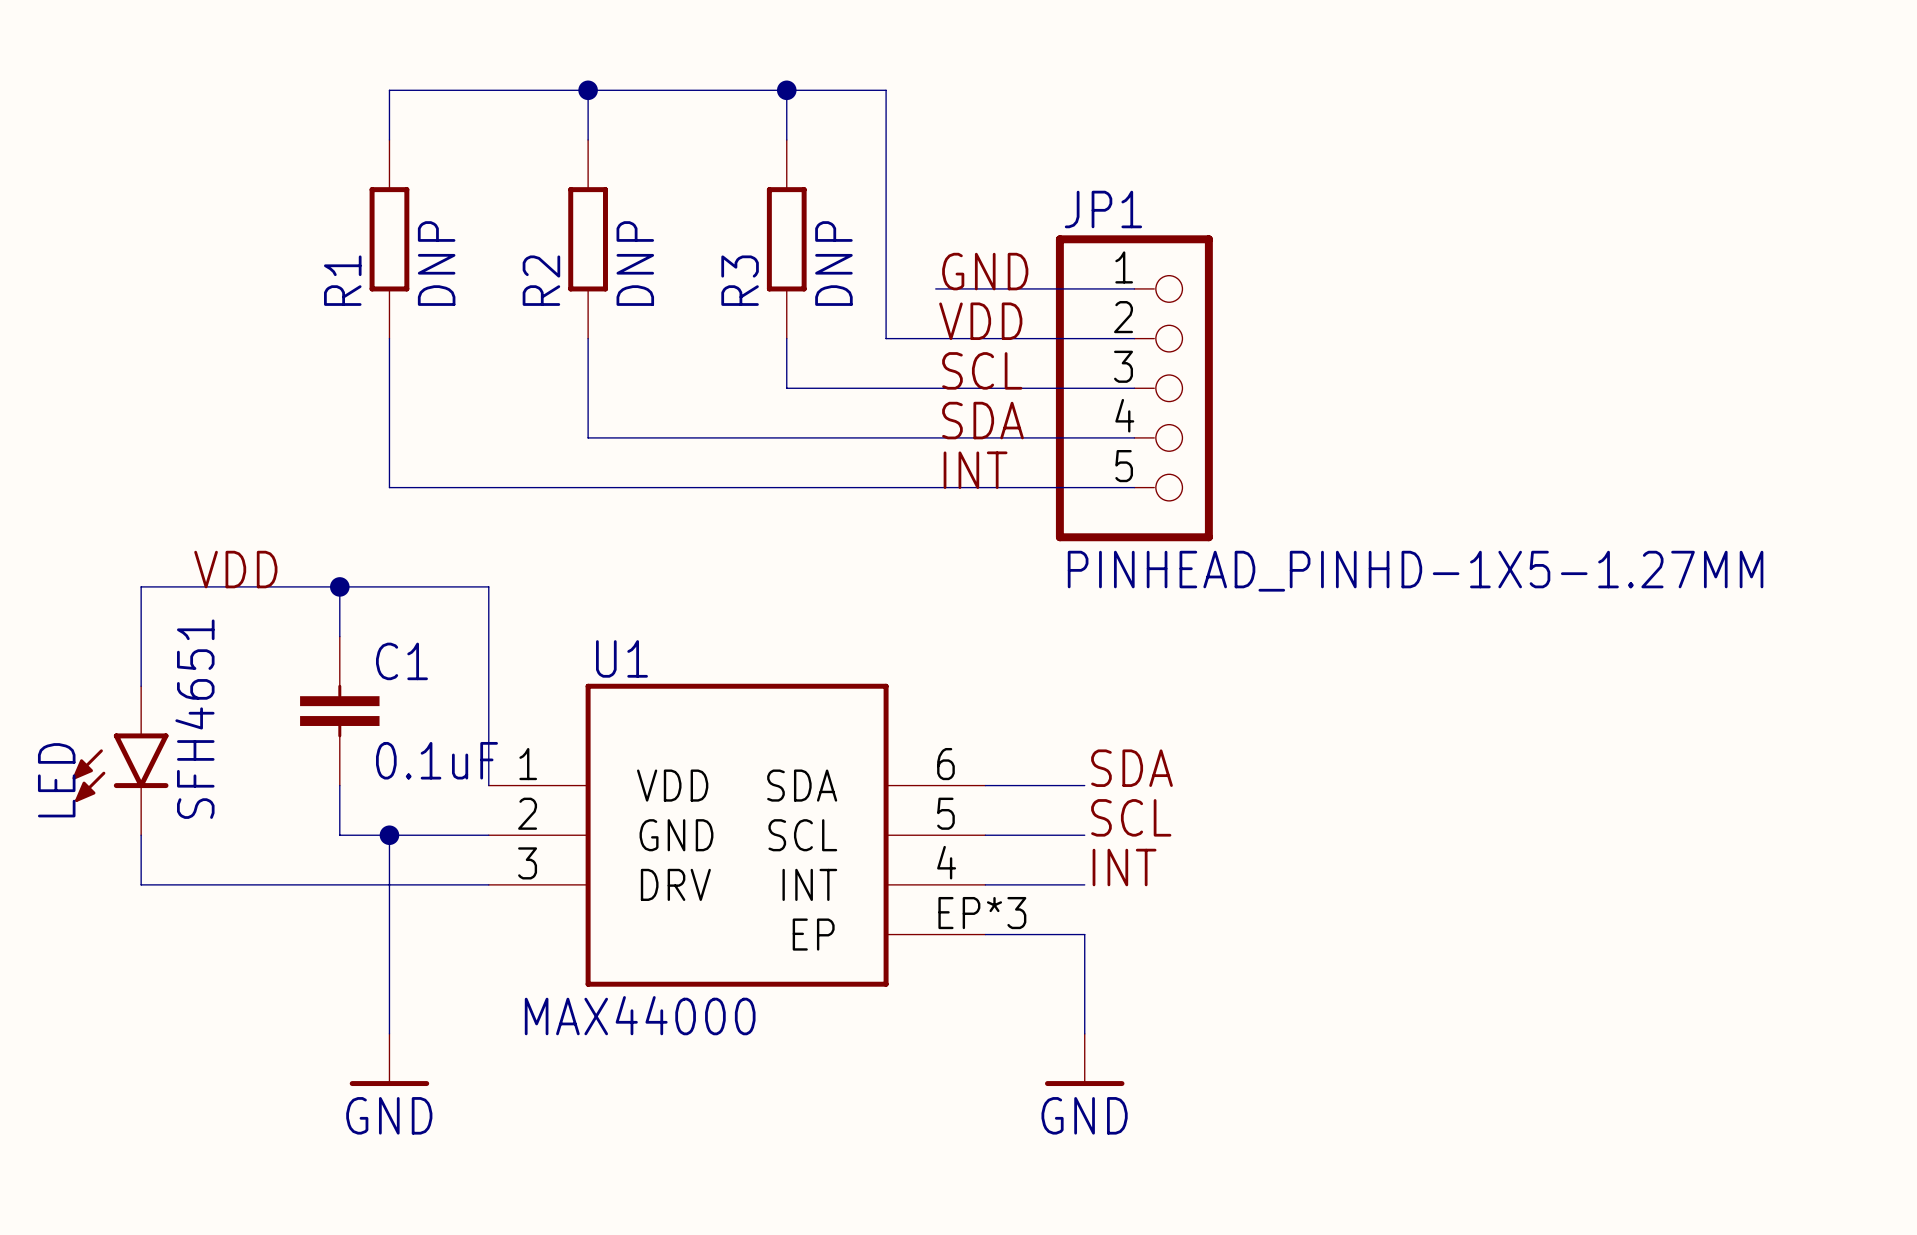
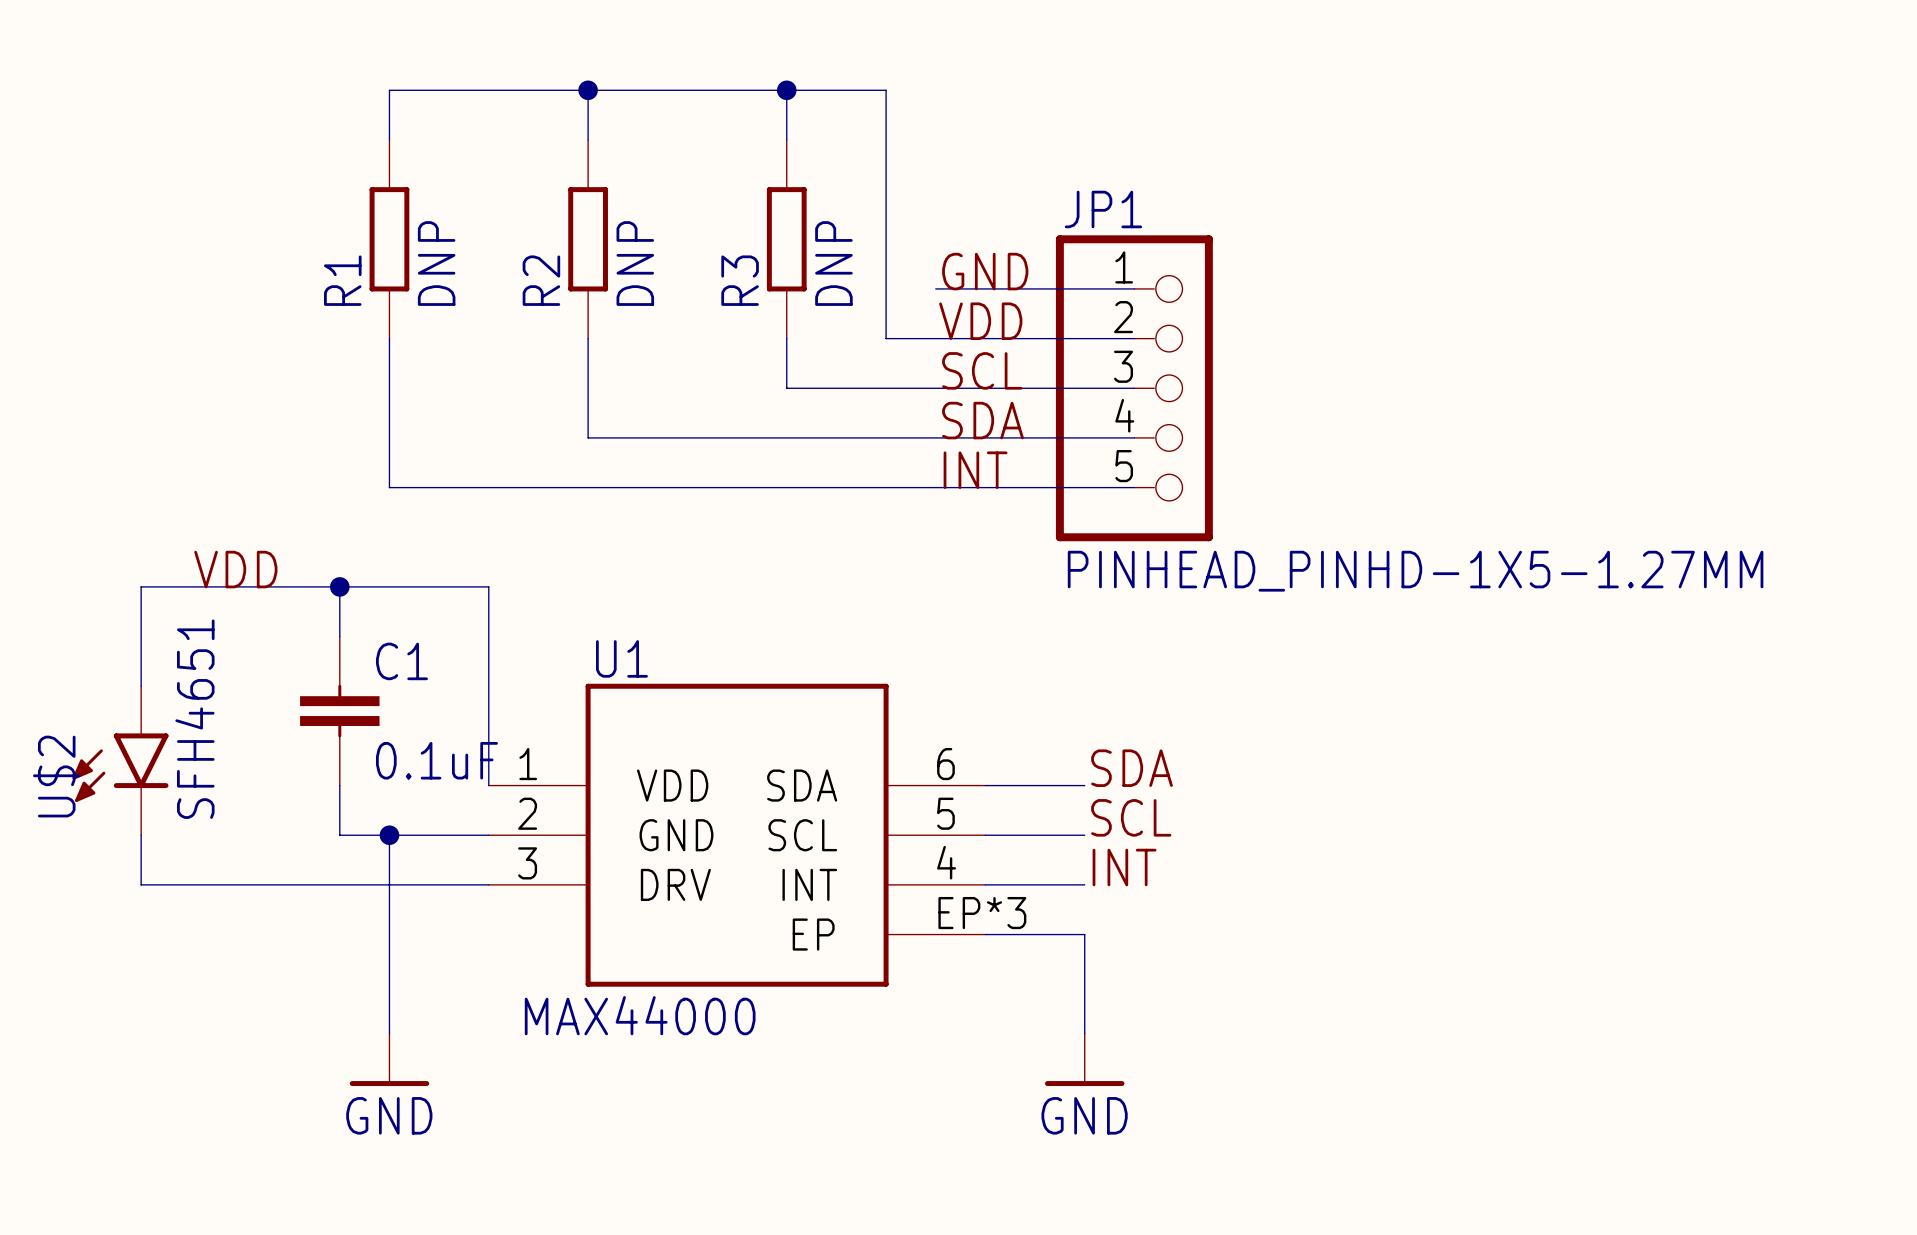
LED name: LED (56, 780) -> U$2 (56, 776)

